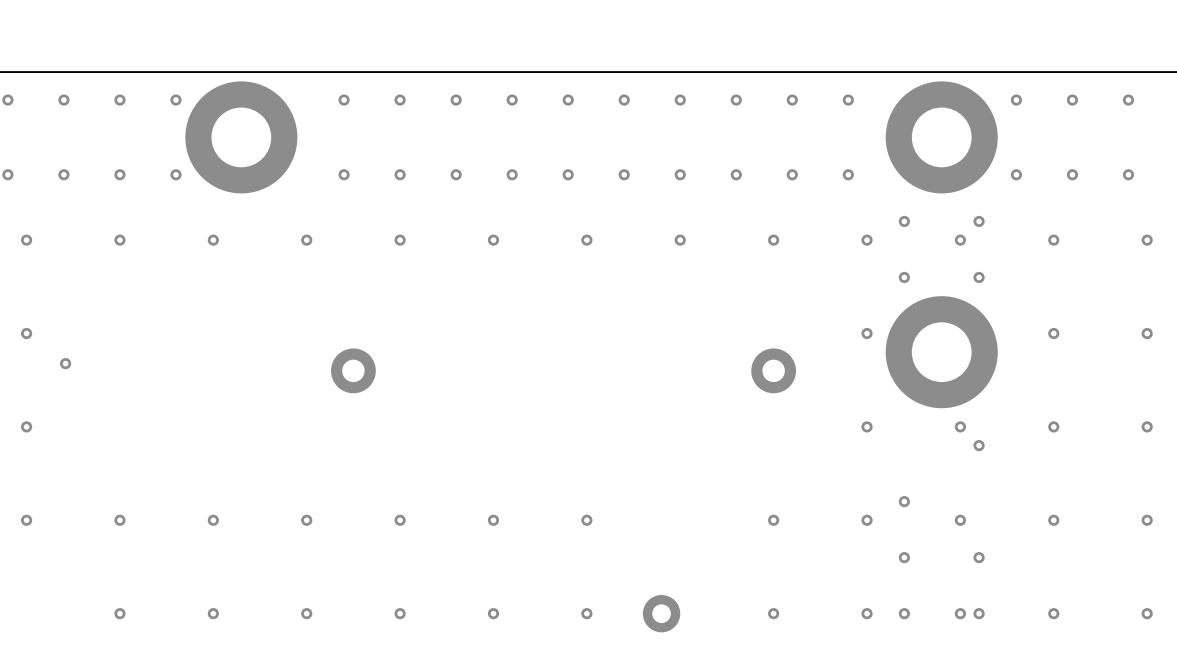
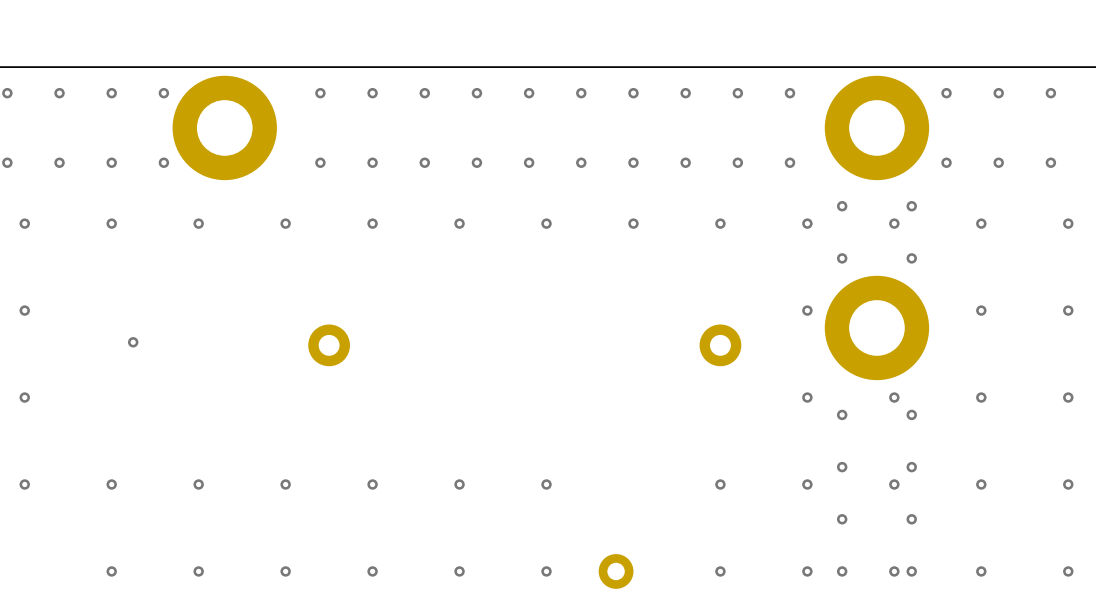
via position: (65, 363) -> (133, 342)
via: none -> (842, 414)
via: none -> (911, 467)

